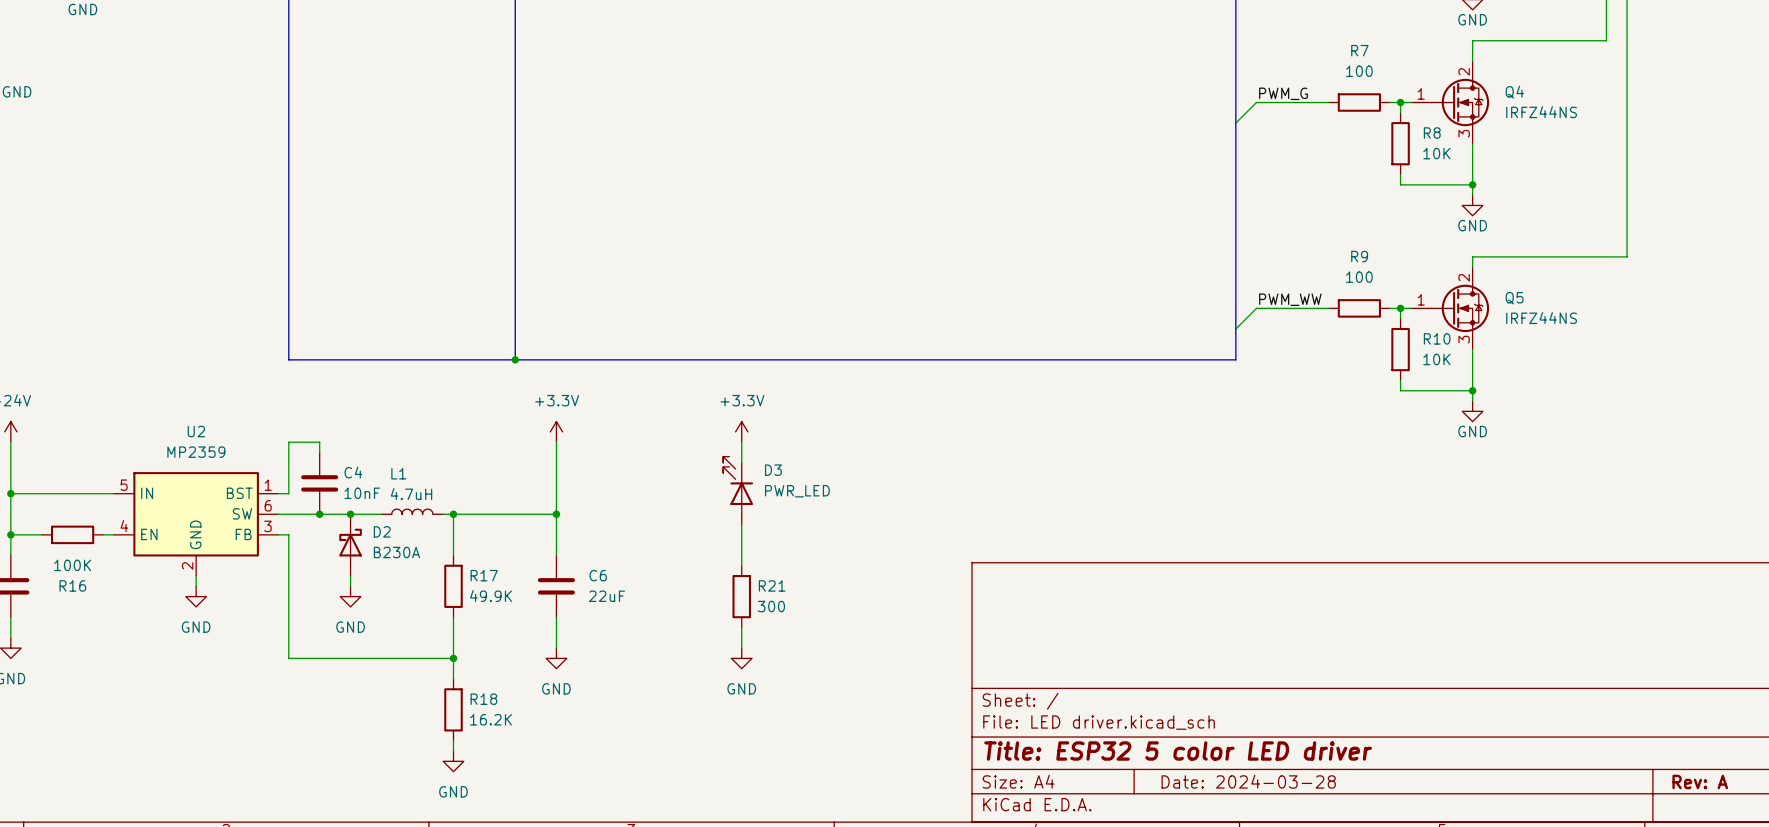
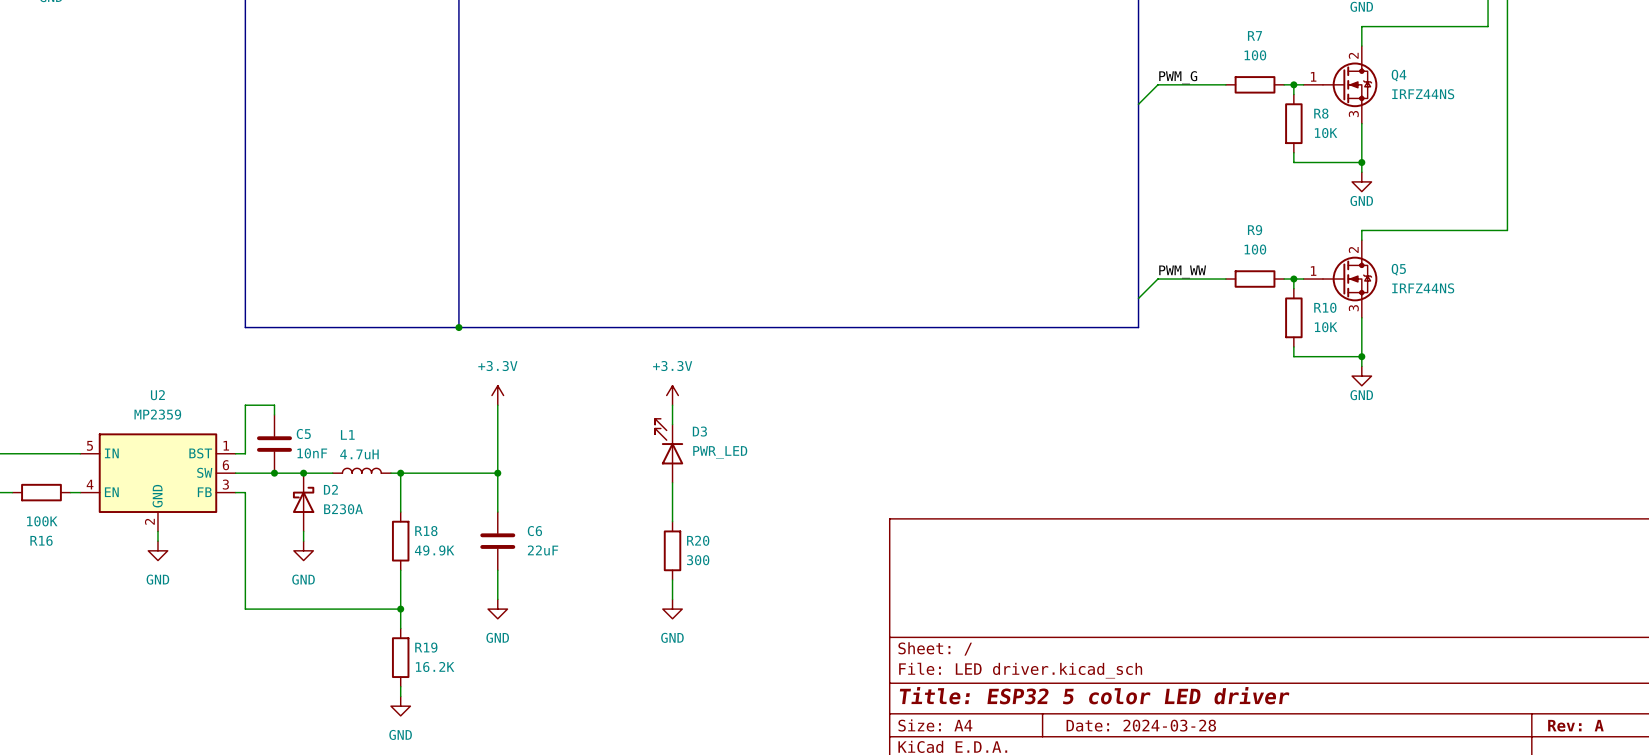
C4 name: C4 (353, 472) -> C5 (303, 433)
R17 name: R17 (484, 575) -> R18 (426, 531)
R21 name: R21 (772, 585) -> R20 (698, 540)
R18 name: R18 (483, 699) -> R19 (426, 647)

